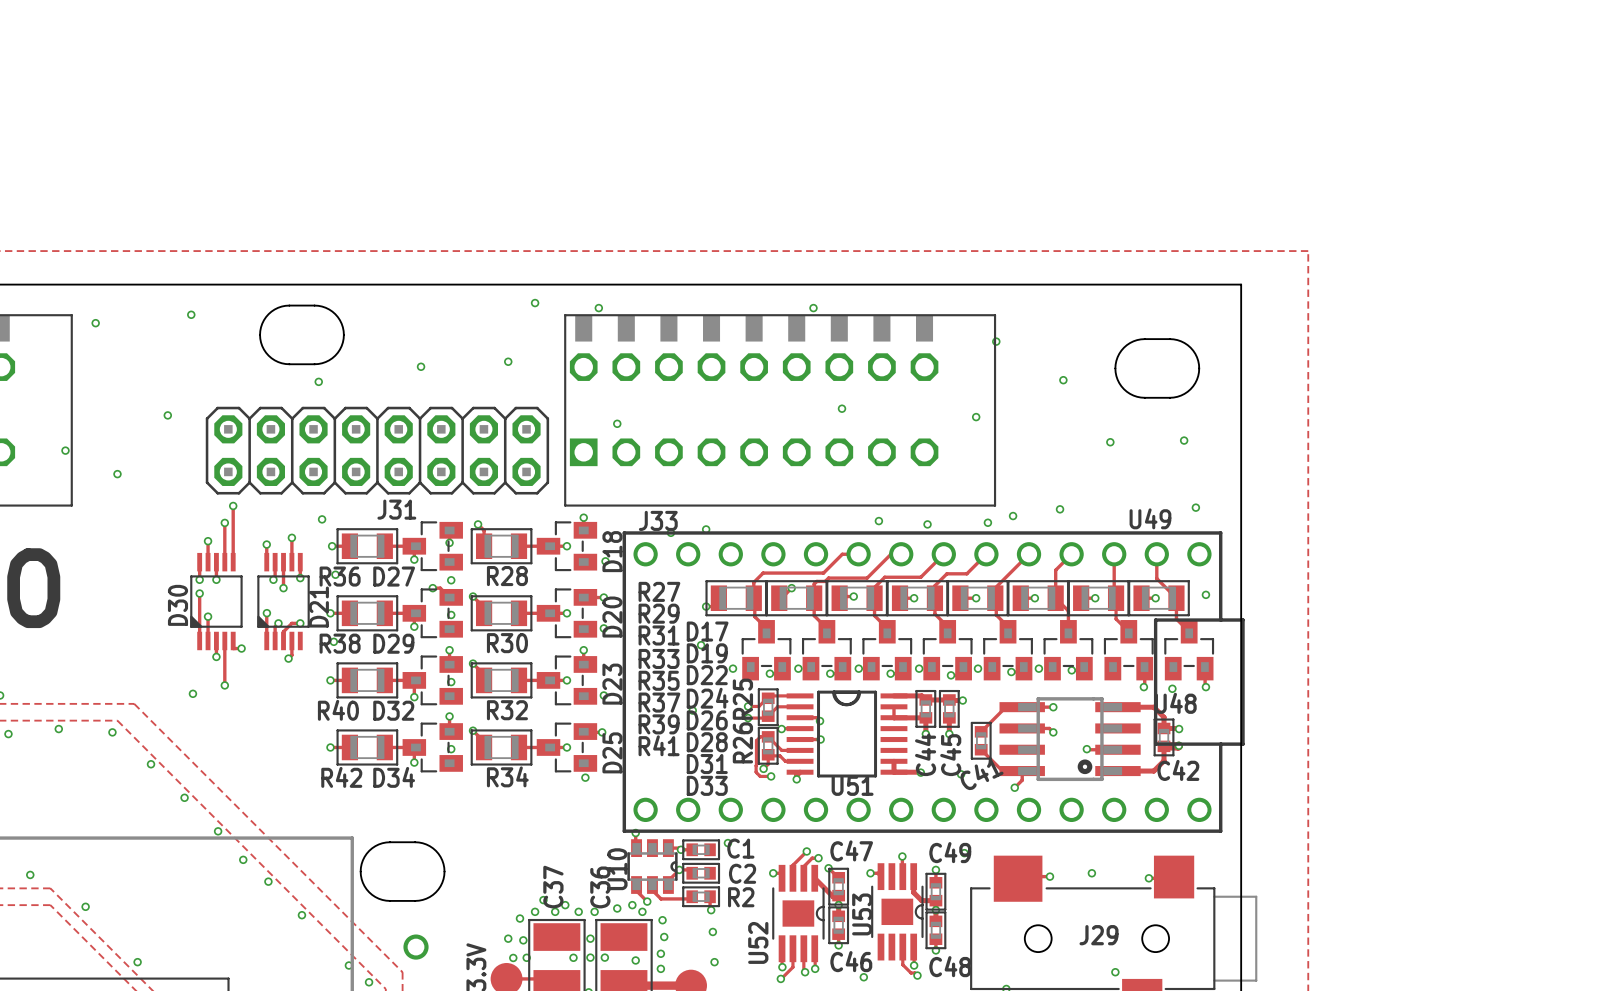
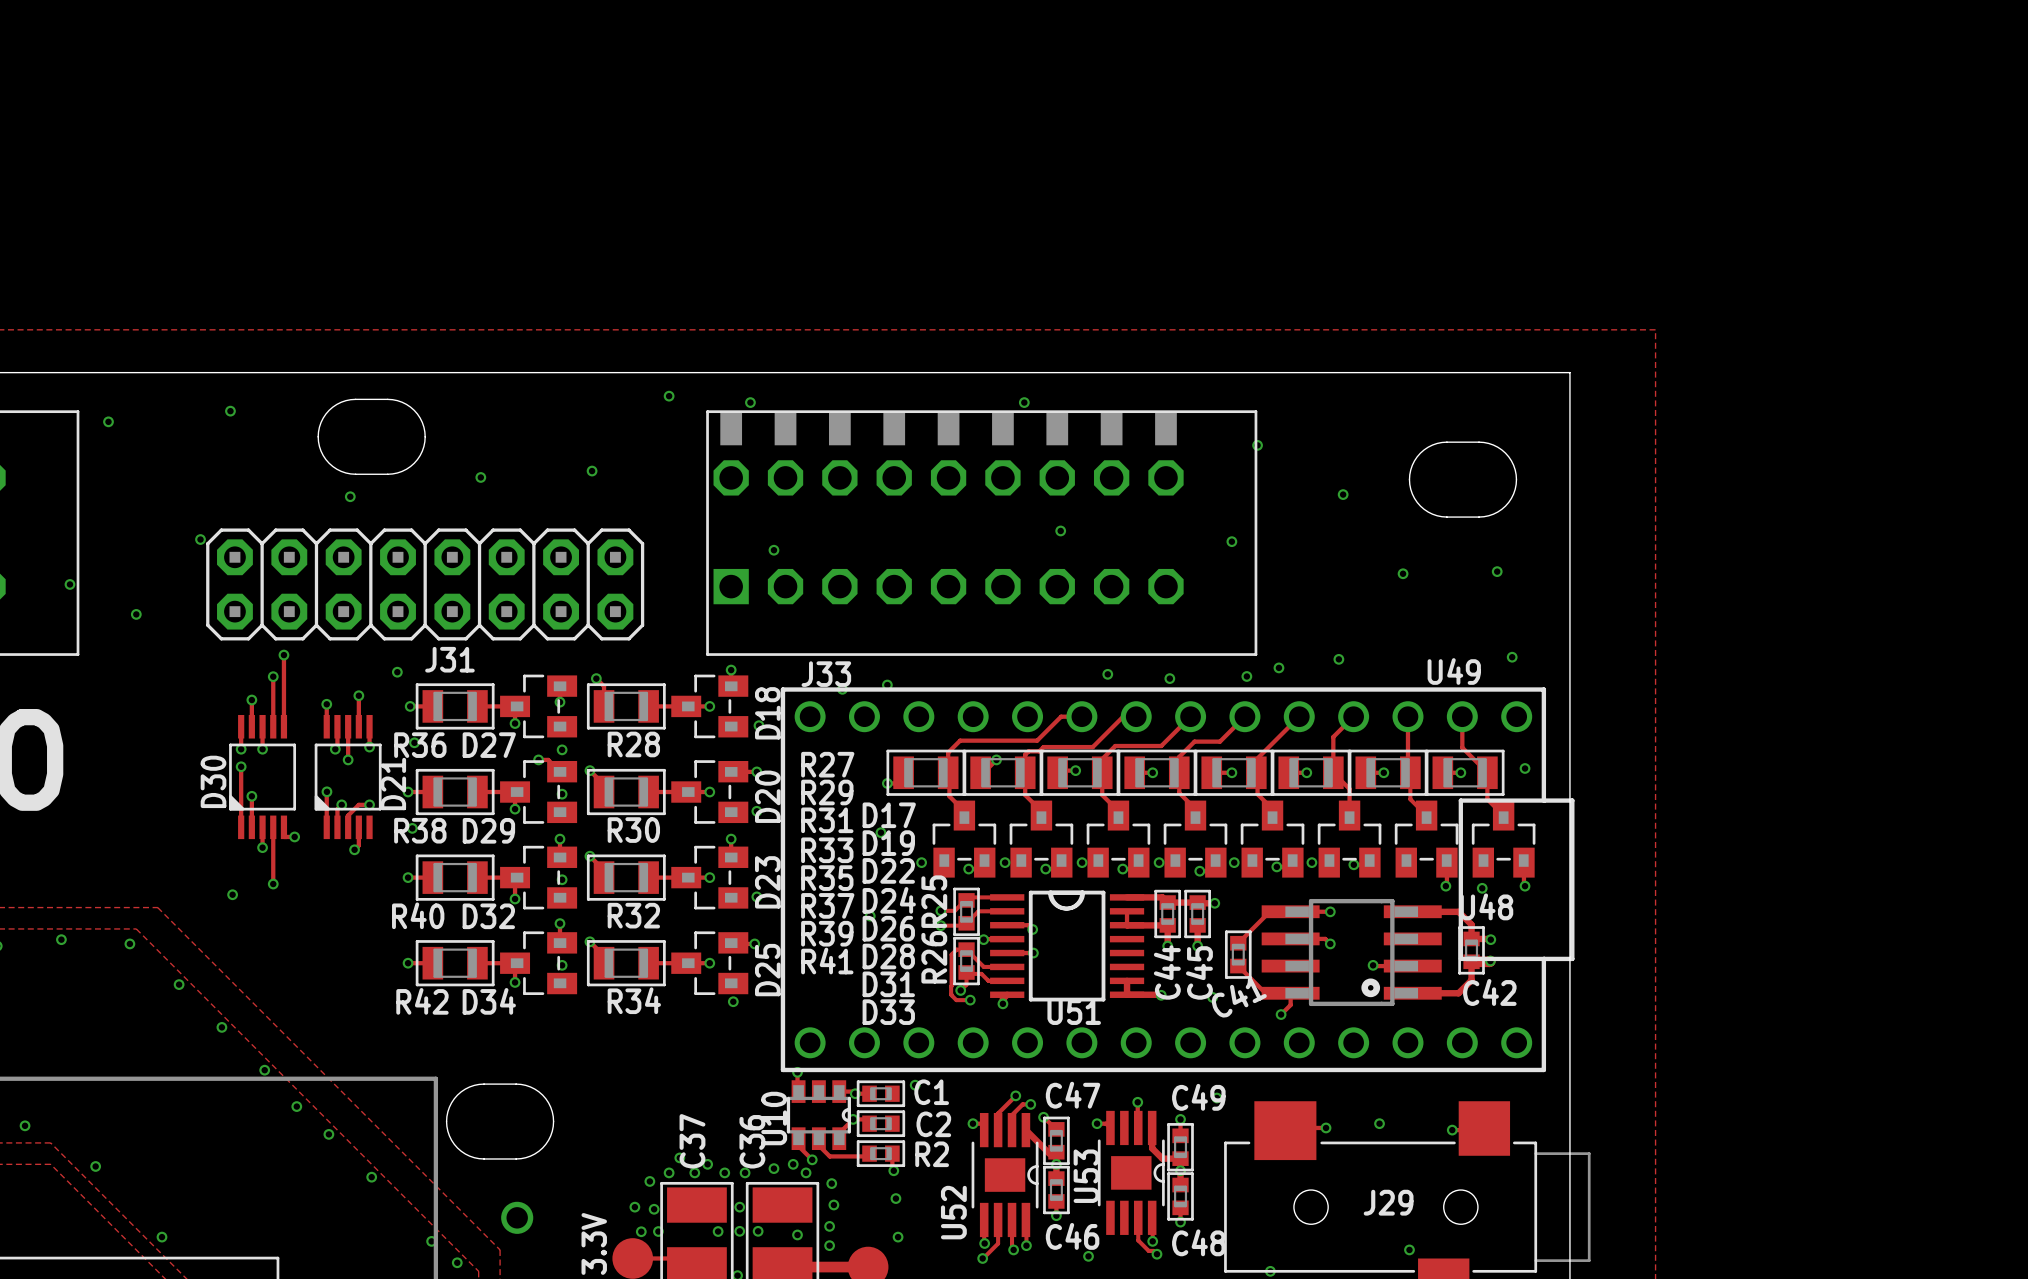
via: none -> (592, 471)
via: (508, 361) -> none
via: none -> (480, 477)
via: (421, 366) -> none
via position: (318, 381) -> (350, 496)
J31 position: (377, 450) -> (425, 584)

